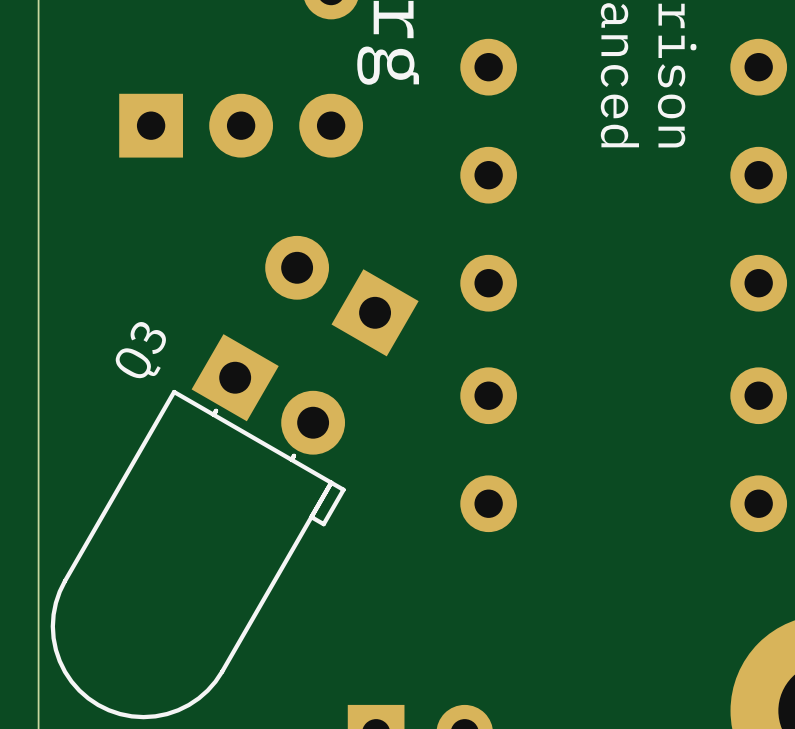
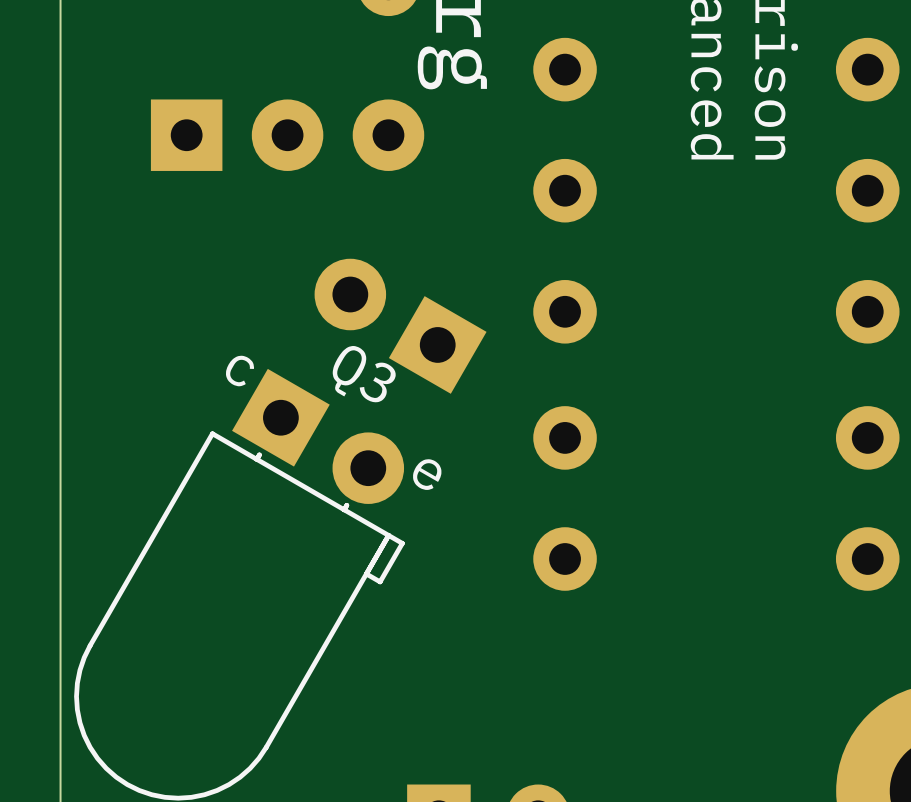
Q3 text: none -> c (240, 371)
Q3 name rotation: 0° (140, 350) -> 90° clockwise (364, 374)
Q3 name position: Q3 (140, 350) -> Q3 (364, 374)
Q3 text: none -> e (427, 474)

